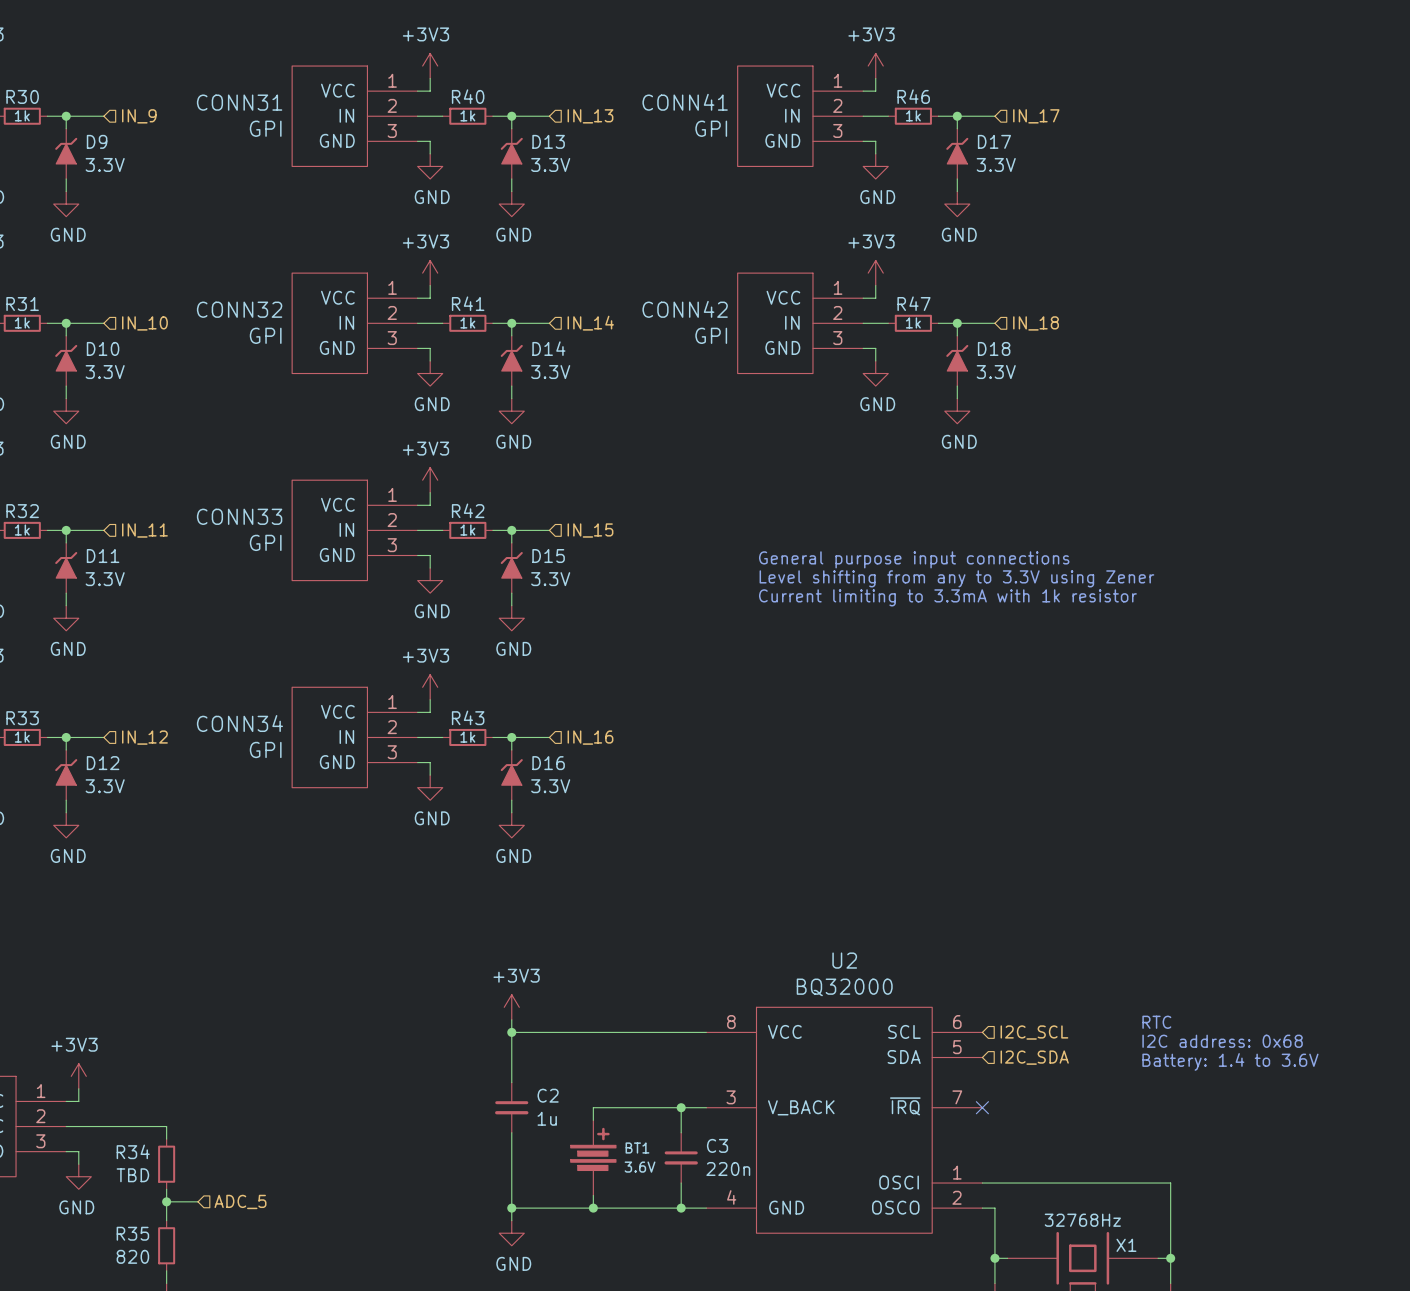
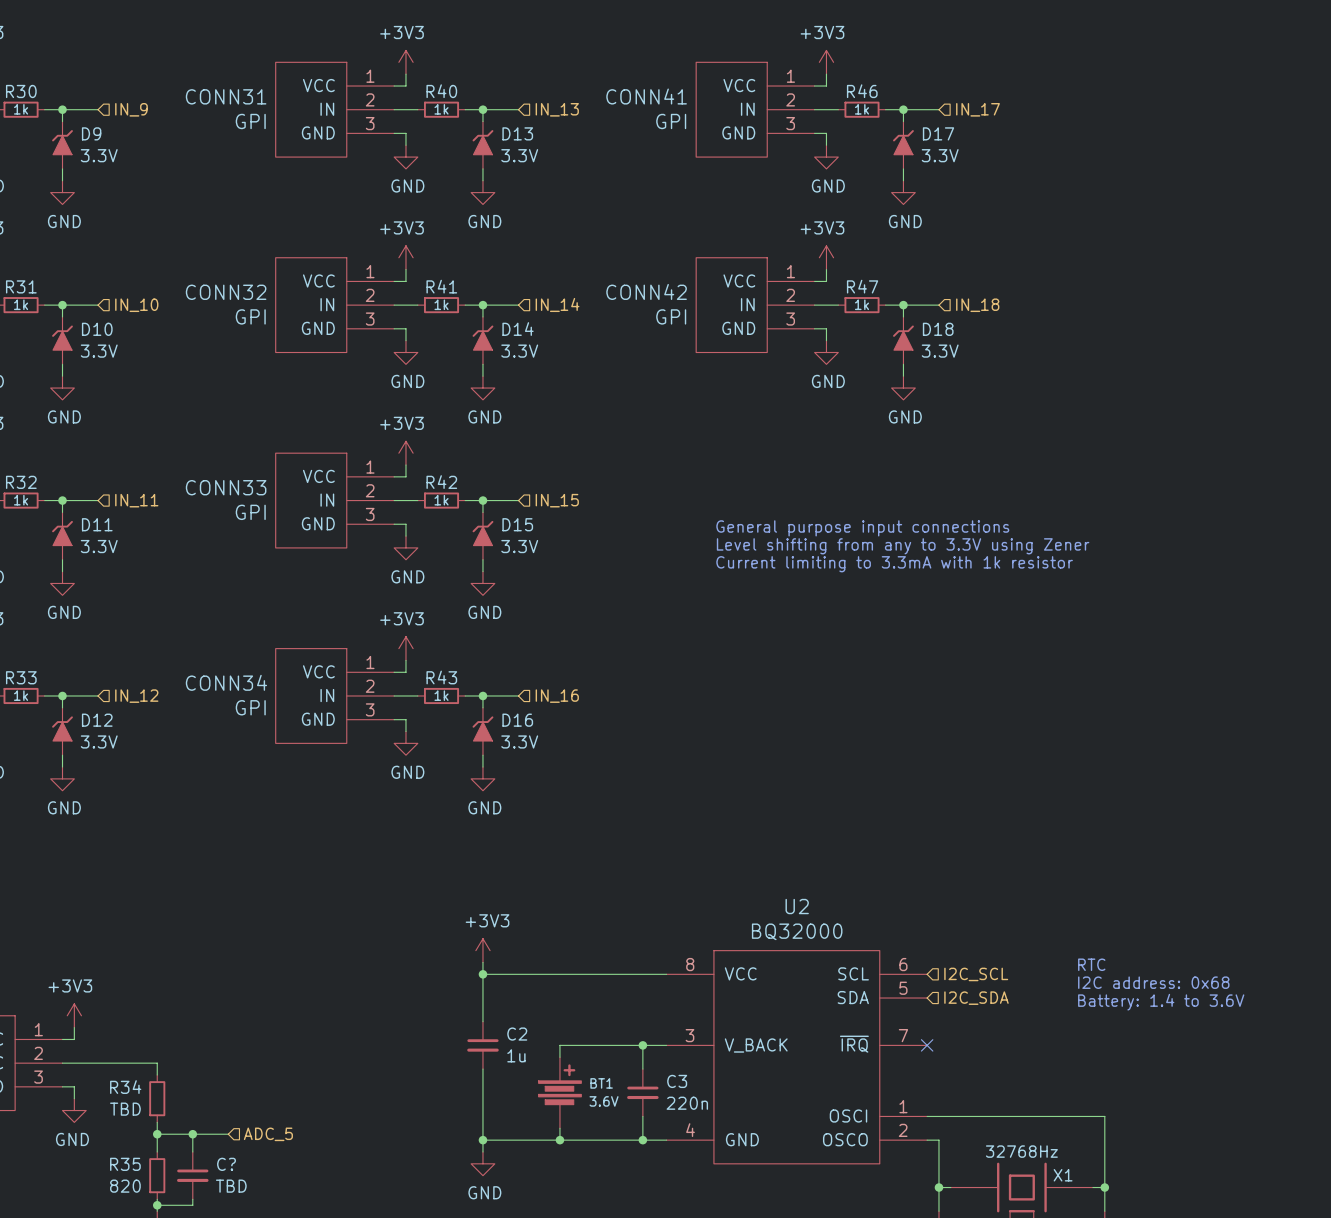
wire: none -> (186, 1134) (228, 1134)
wire: none -> (192, 1134) (192, 1151)
junction: none -> (192, 1134)
hierarchical label position: ADC_5 (240, 1201) -> ADC_5 (268, 1134)
C?: none -> TBD (192, 1175)
wire: none -> (192, 1199) (192, 1205) (157, 1205)
junction: none -> (157, 1205)

